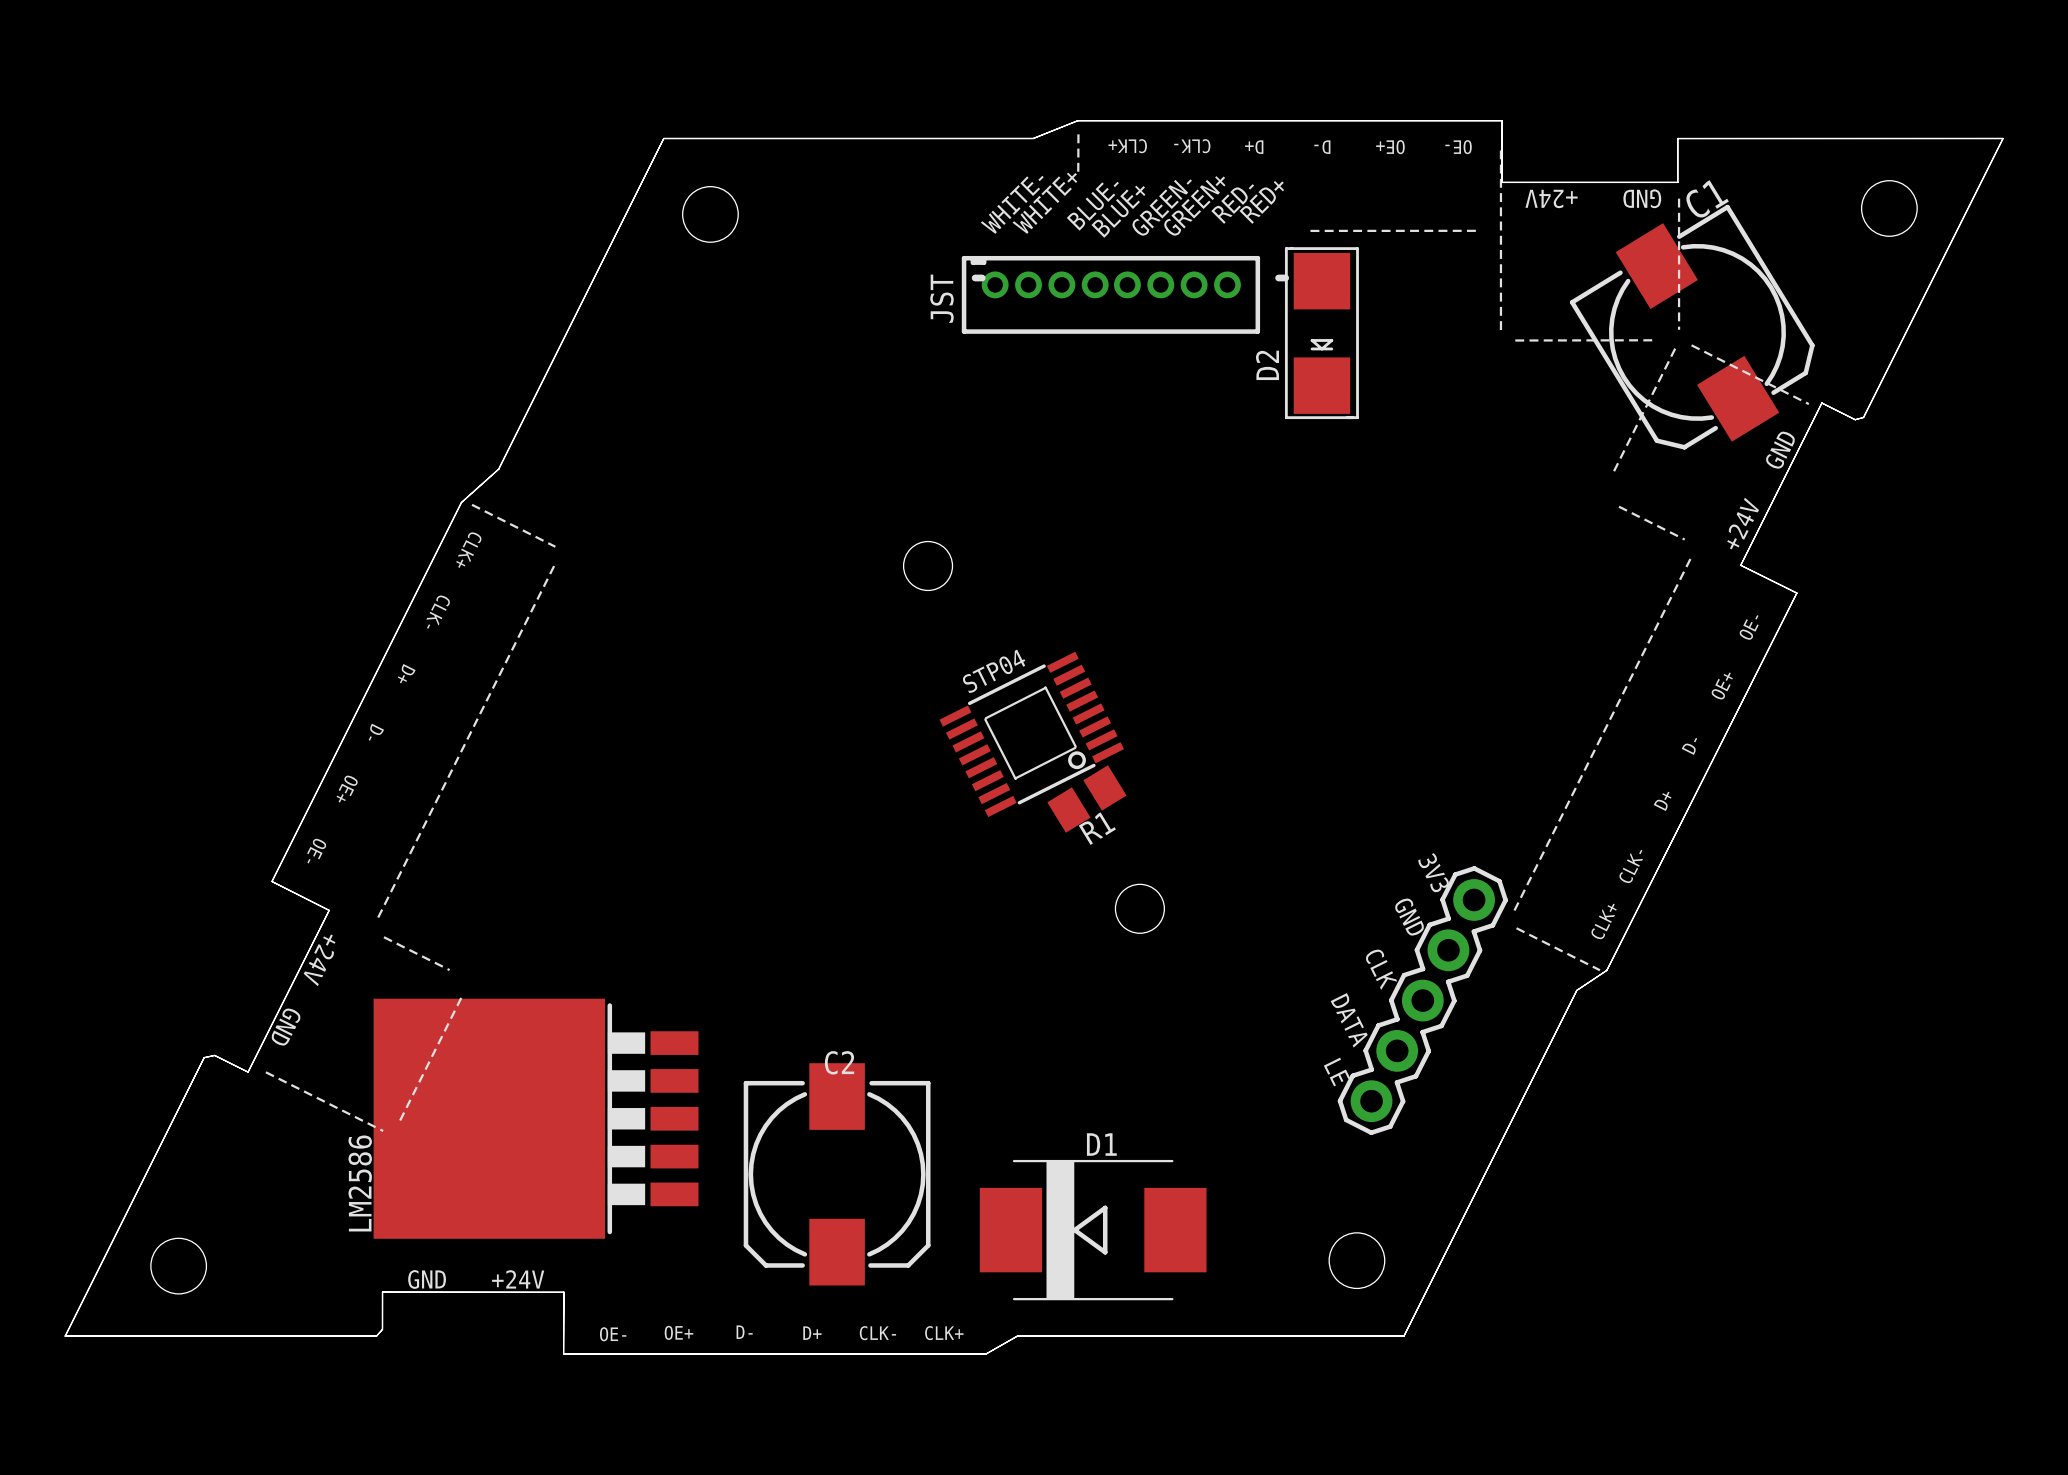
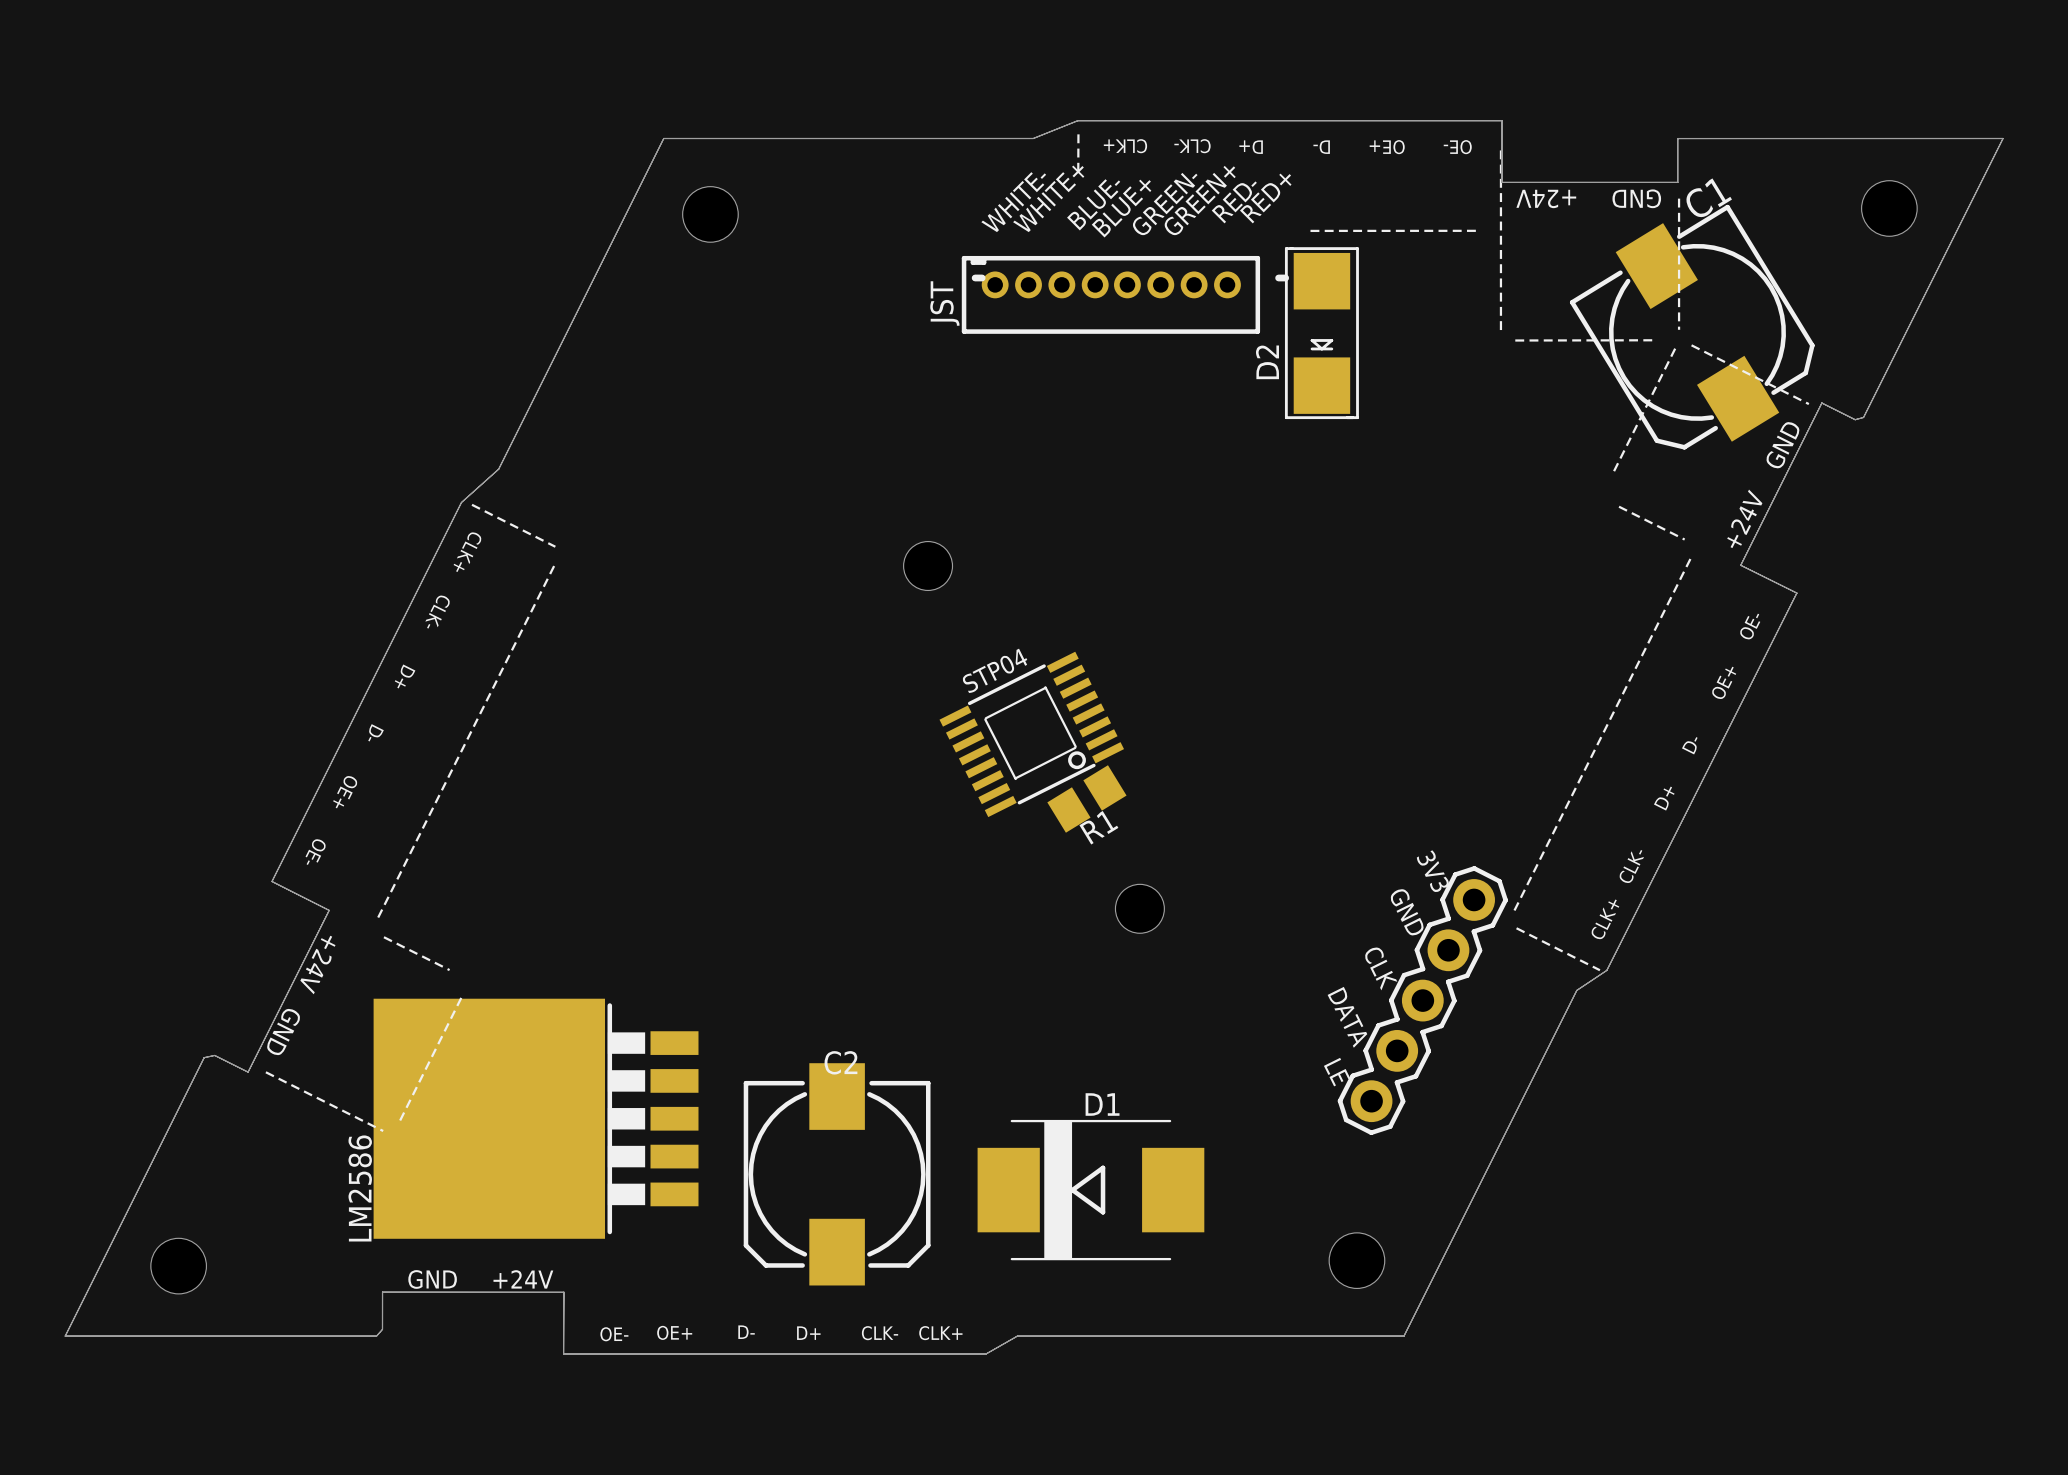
D1 position: (1093, 1230) -> (1090, 1190)

